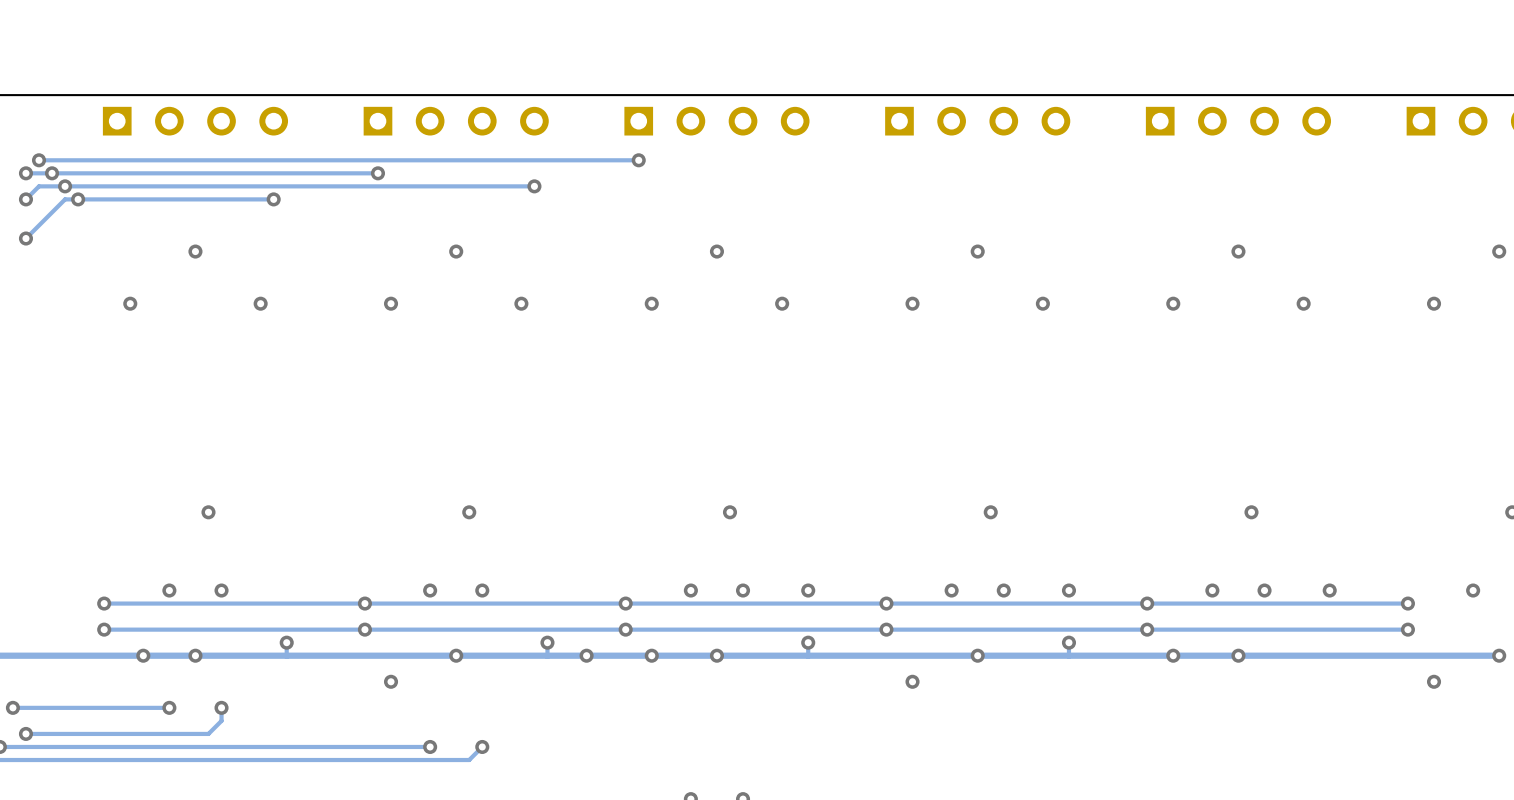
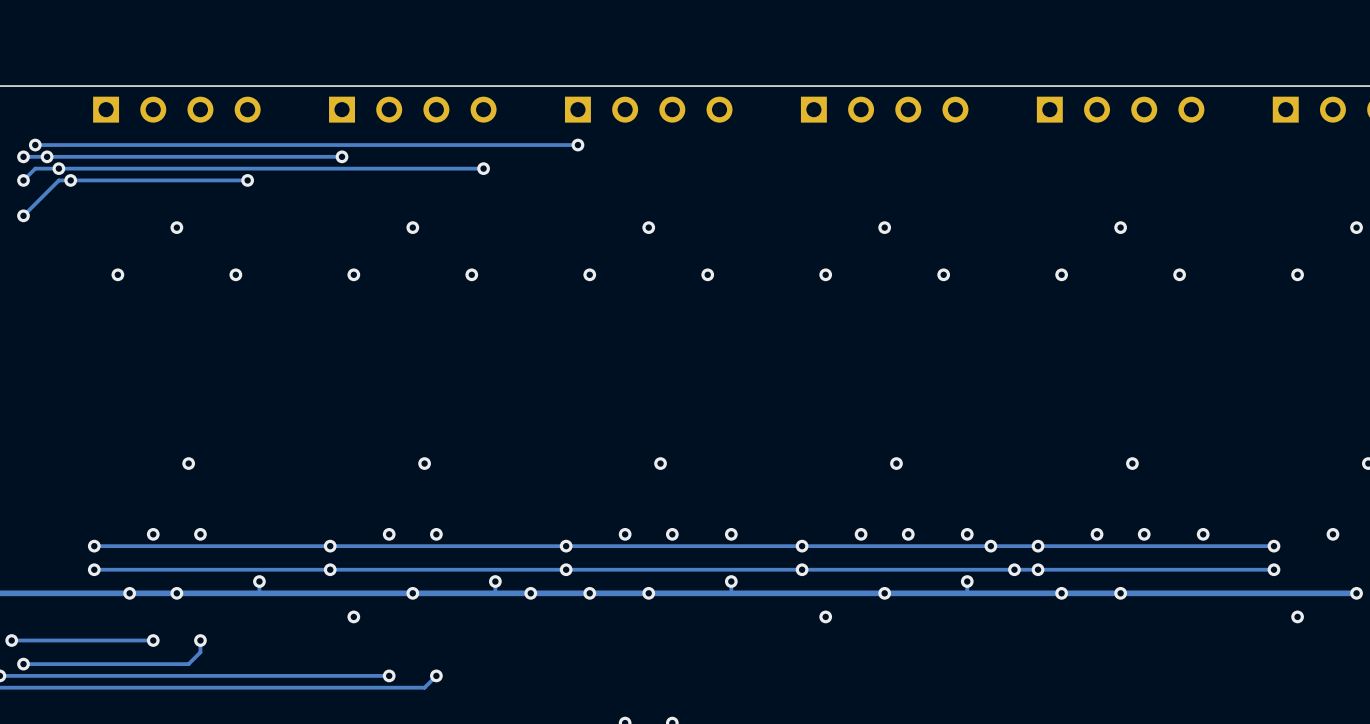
via: none -> (990, 546)
via: none -> (1014, 569)

